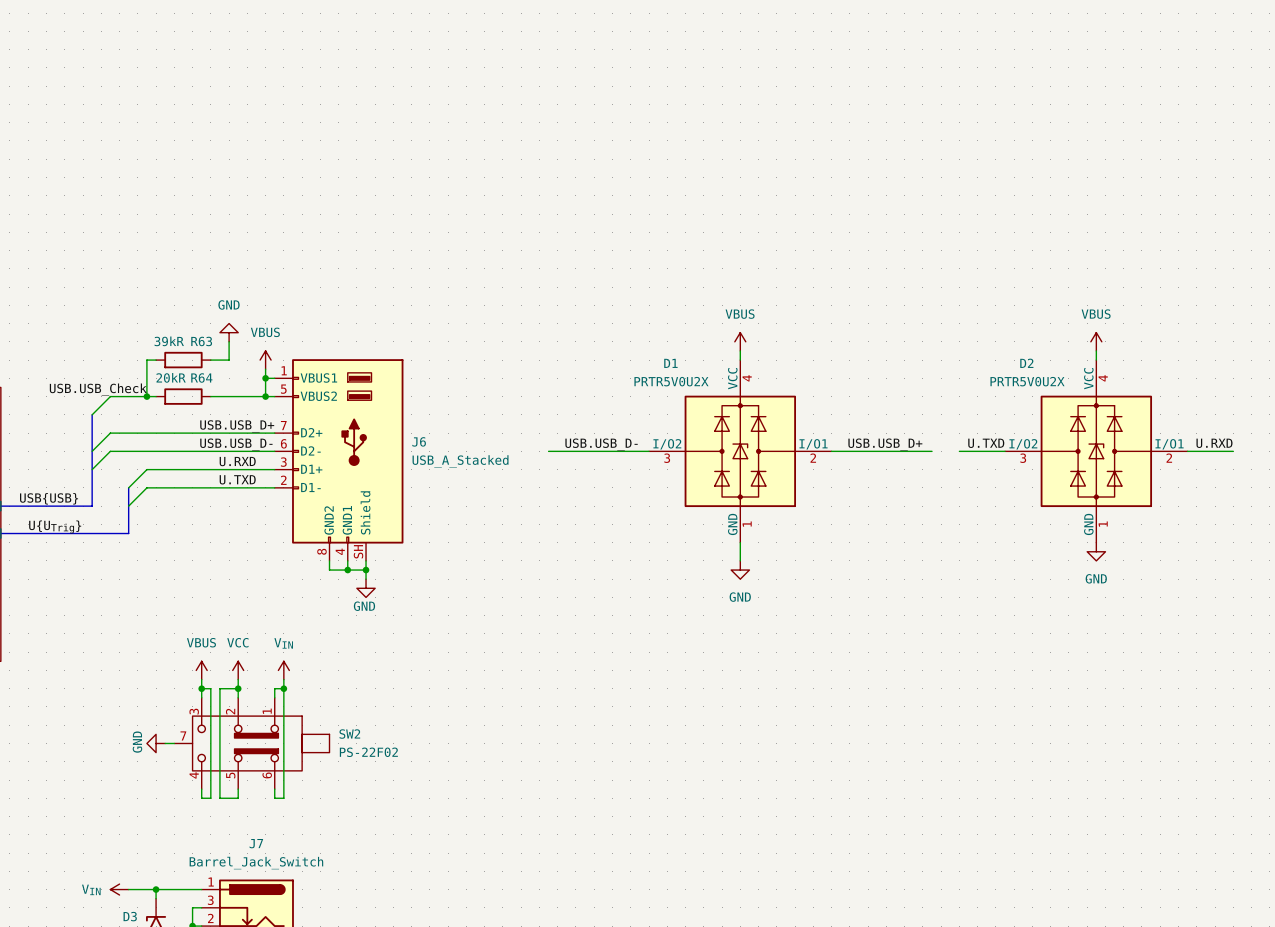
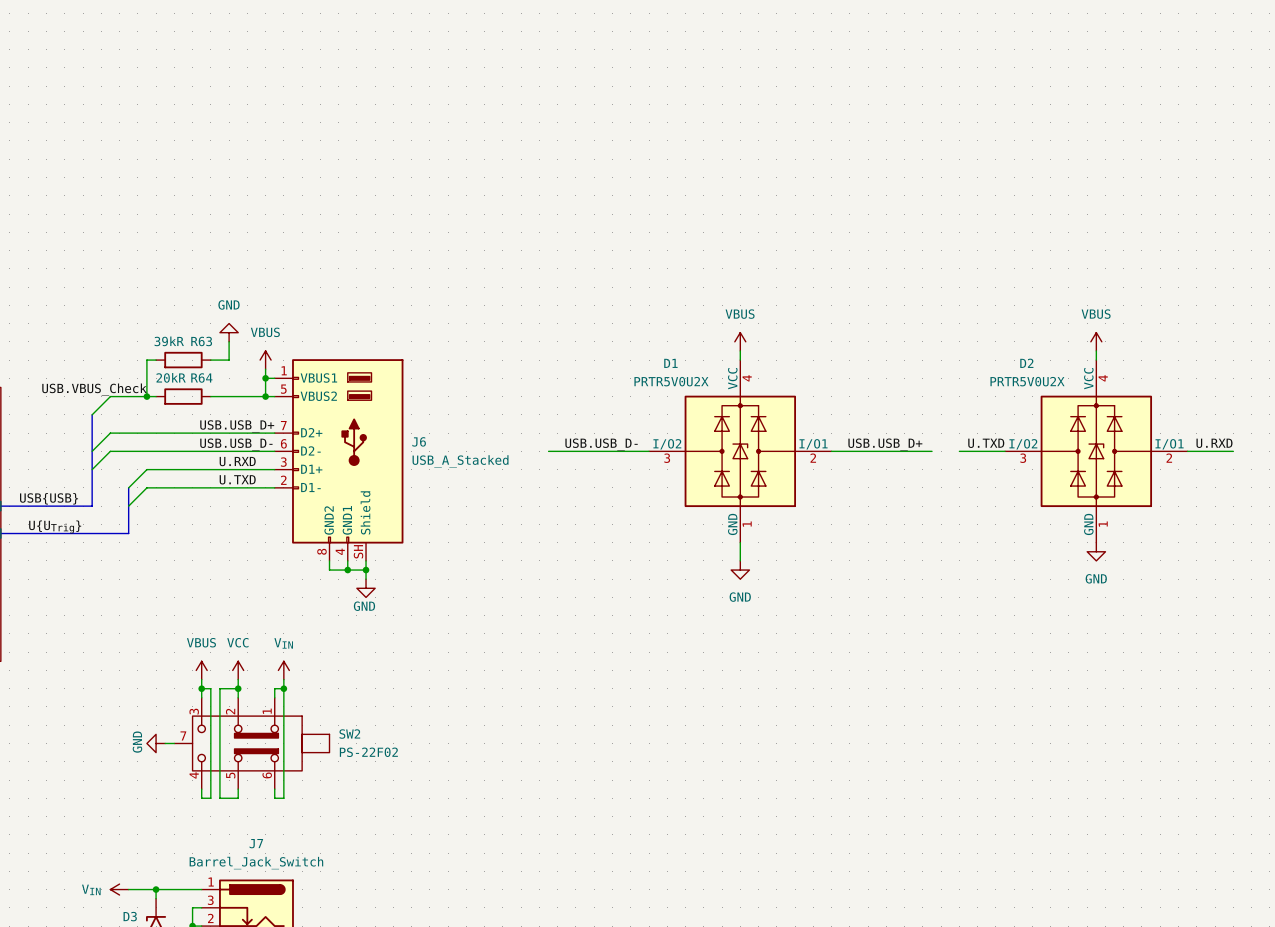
label: USB.USB_Check (98, 389) -> USB.VBUS_Check (94, 389)

